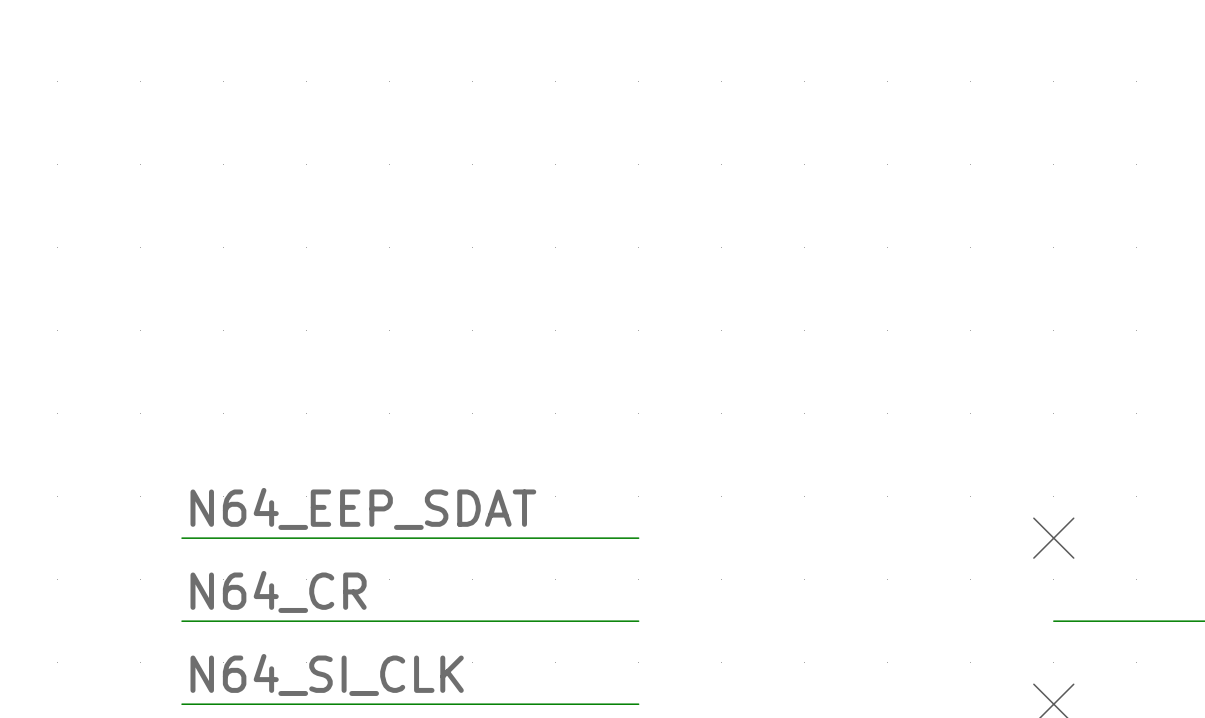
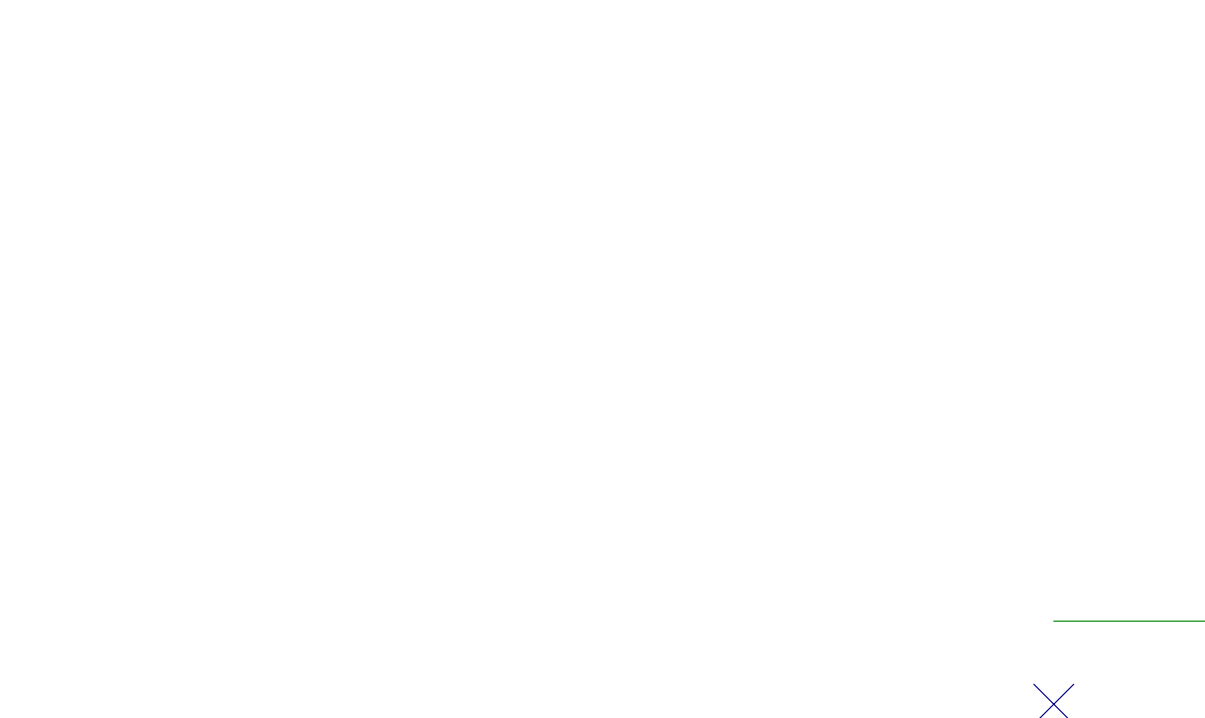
label: N64_EEP_SDAT (363, 508) -> none
wire: (181, 538) (638, 538) -> none
no-connect mark: (1053, 538) -> none
label: N64_CR (278, 591) -> none
wire: (181, 621) (638, 621) -> none
label: N64_SI_CLK (327, 674) -> none
wire: (181, 704) (638, 704) -> none

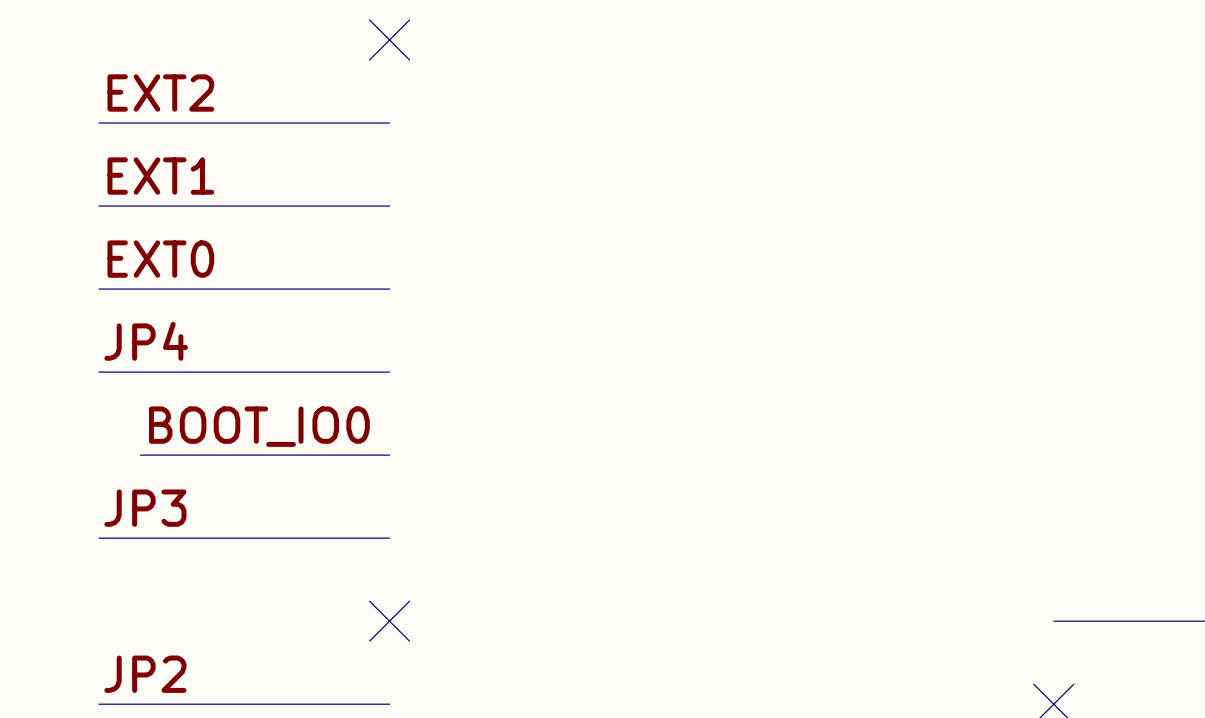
no-connect mark: none -> (389, 39)
label: none -> EXT2 (160, 93)
wire: none -> (98, 123) (389, 123)
label: none -> EXT1 (160, 176)
wire: none -> (98, 206) (389, 206)
label: none -> EXT0 (160, 259)
wire: none -> (98, 289) (389, 289)
label: none -> JP4 (146, 341)
wire: none -> (98, 372) (389, 372)
label: none -> BOOT_IO0 (259, 426)
wire: none -> (140, 455) (389, 455)
label: none -> JP3 (145, 508)
wire: none -> (98, 538) (389, 538)
no-connect mark: none -> (389, 621)
label: none -> JP2 (145, 674)
wire: none -> (98, 704) (389, 704)

